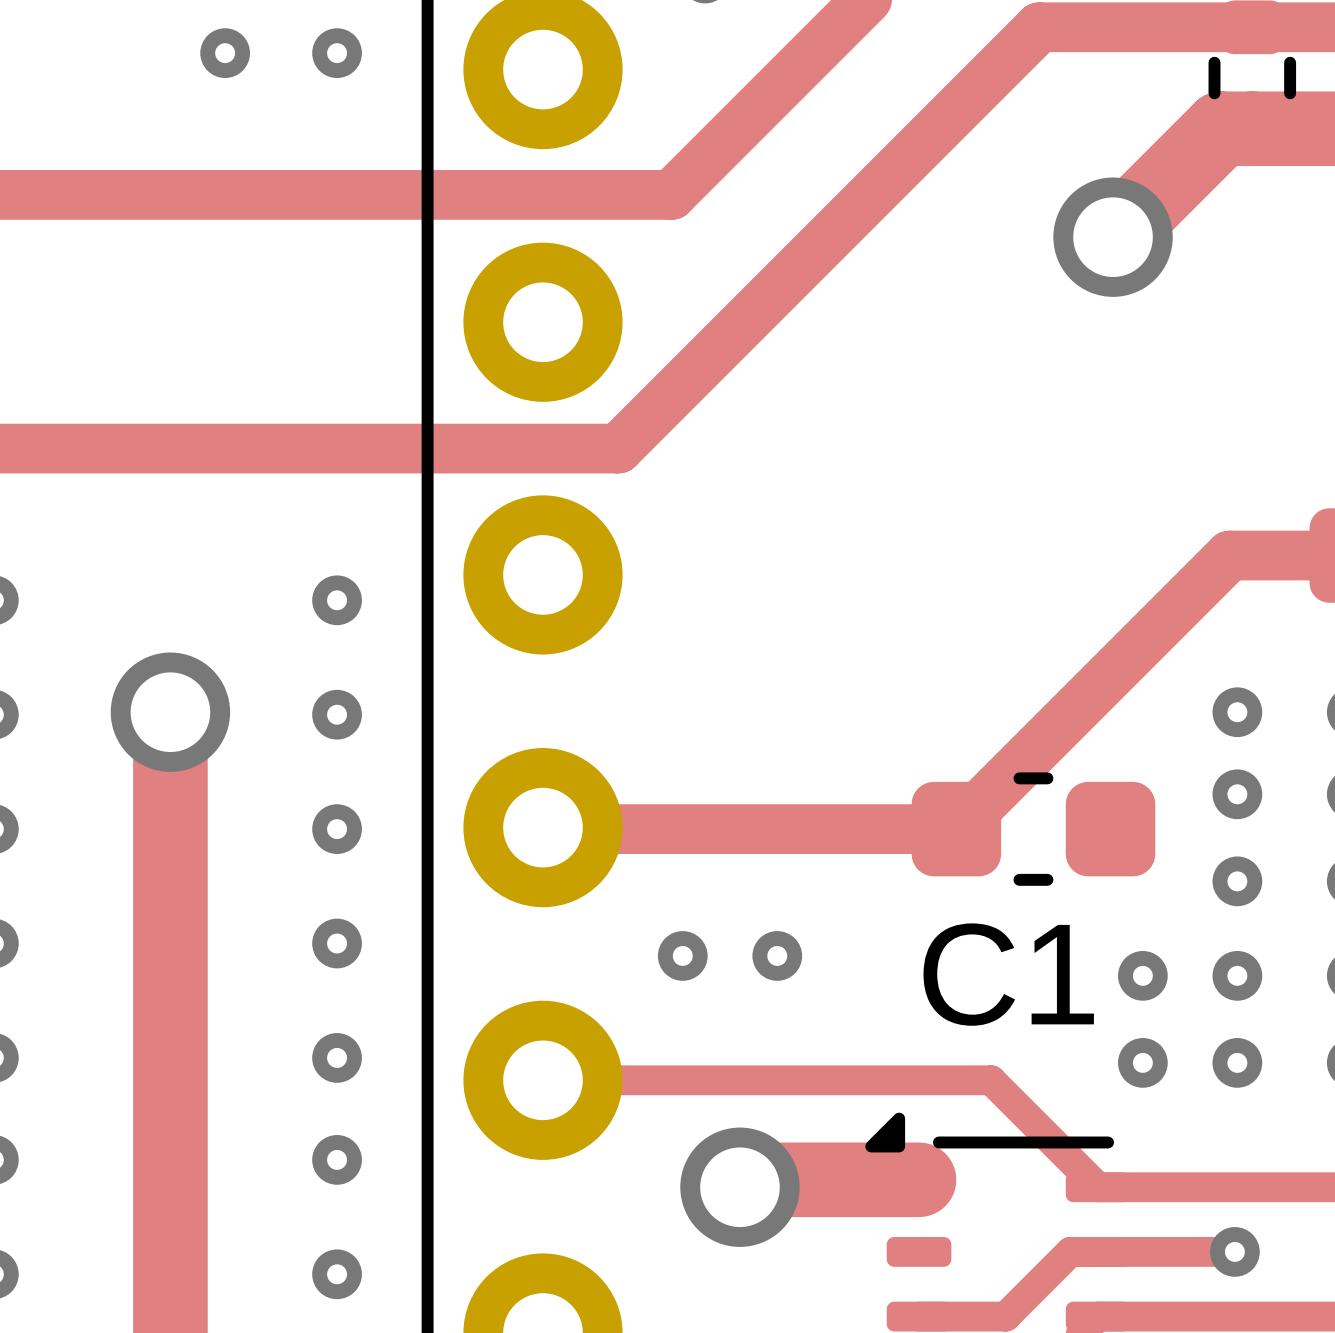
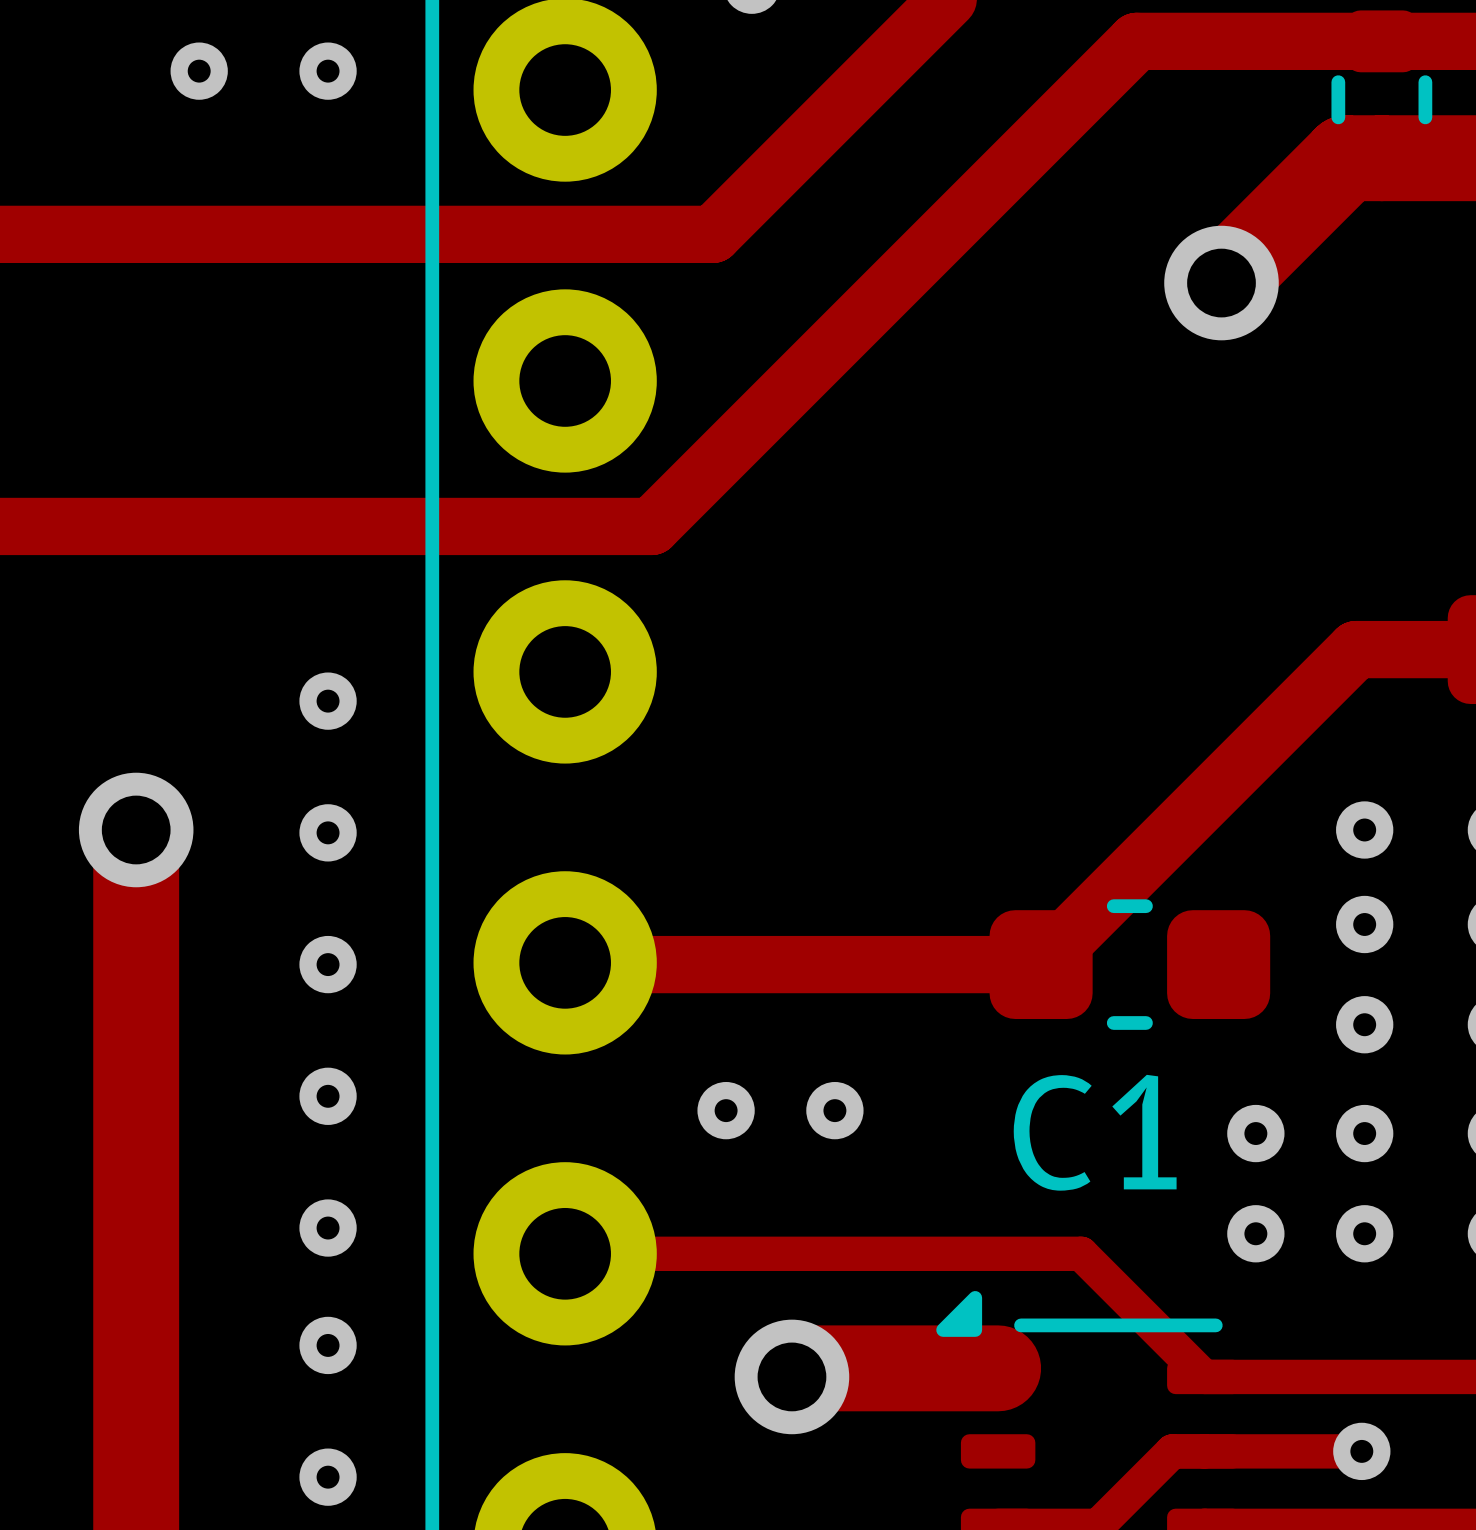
via size: [1053, 177, 1173, 297] -> [1164, 225, 1279, 341]
via size: [110, 652, 231, 772] -> [78, 772, 194, 888]
via size: [680, 1127, 800, 1247] -> [734, 1319, 850, 1435]

